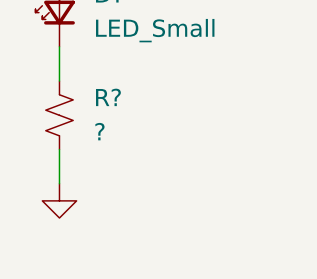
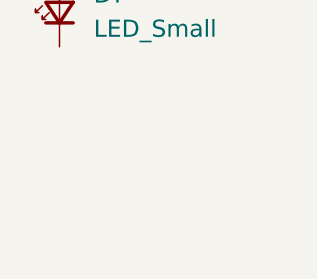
wire: (59, 46) (59, 81) -> none
R?: ? (59, 115) -> none
wire: (59, 149) (59, 183) -> none
power symbol: (59, 200) -> none

